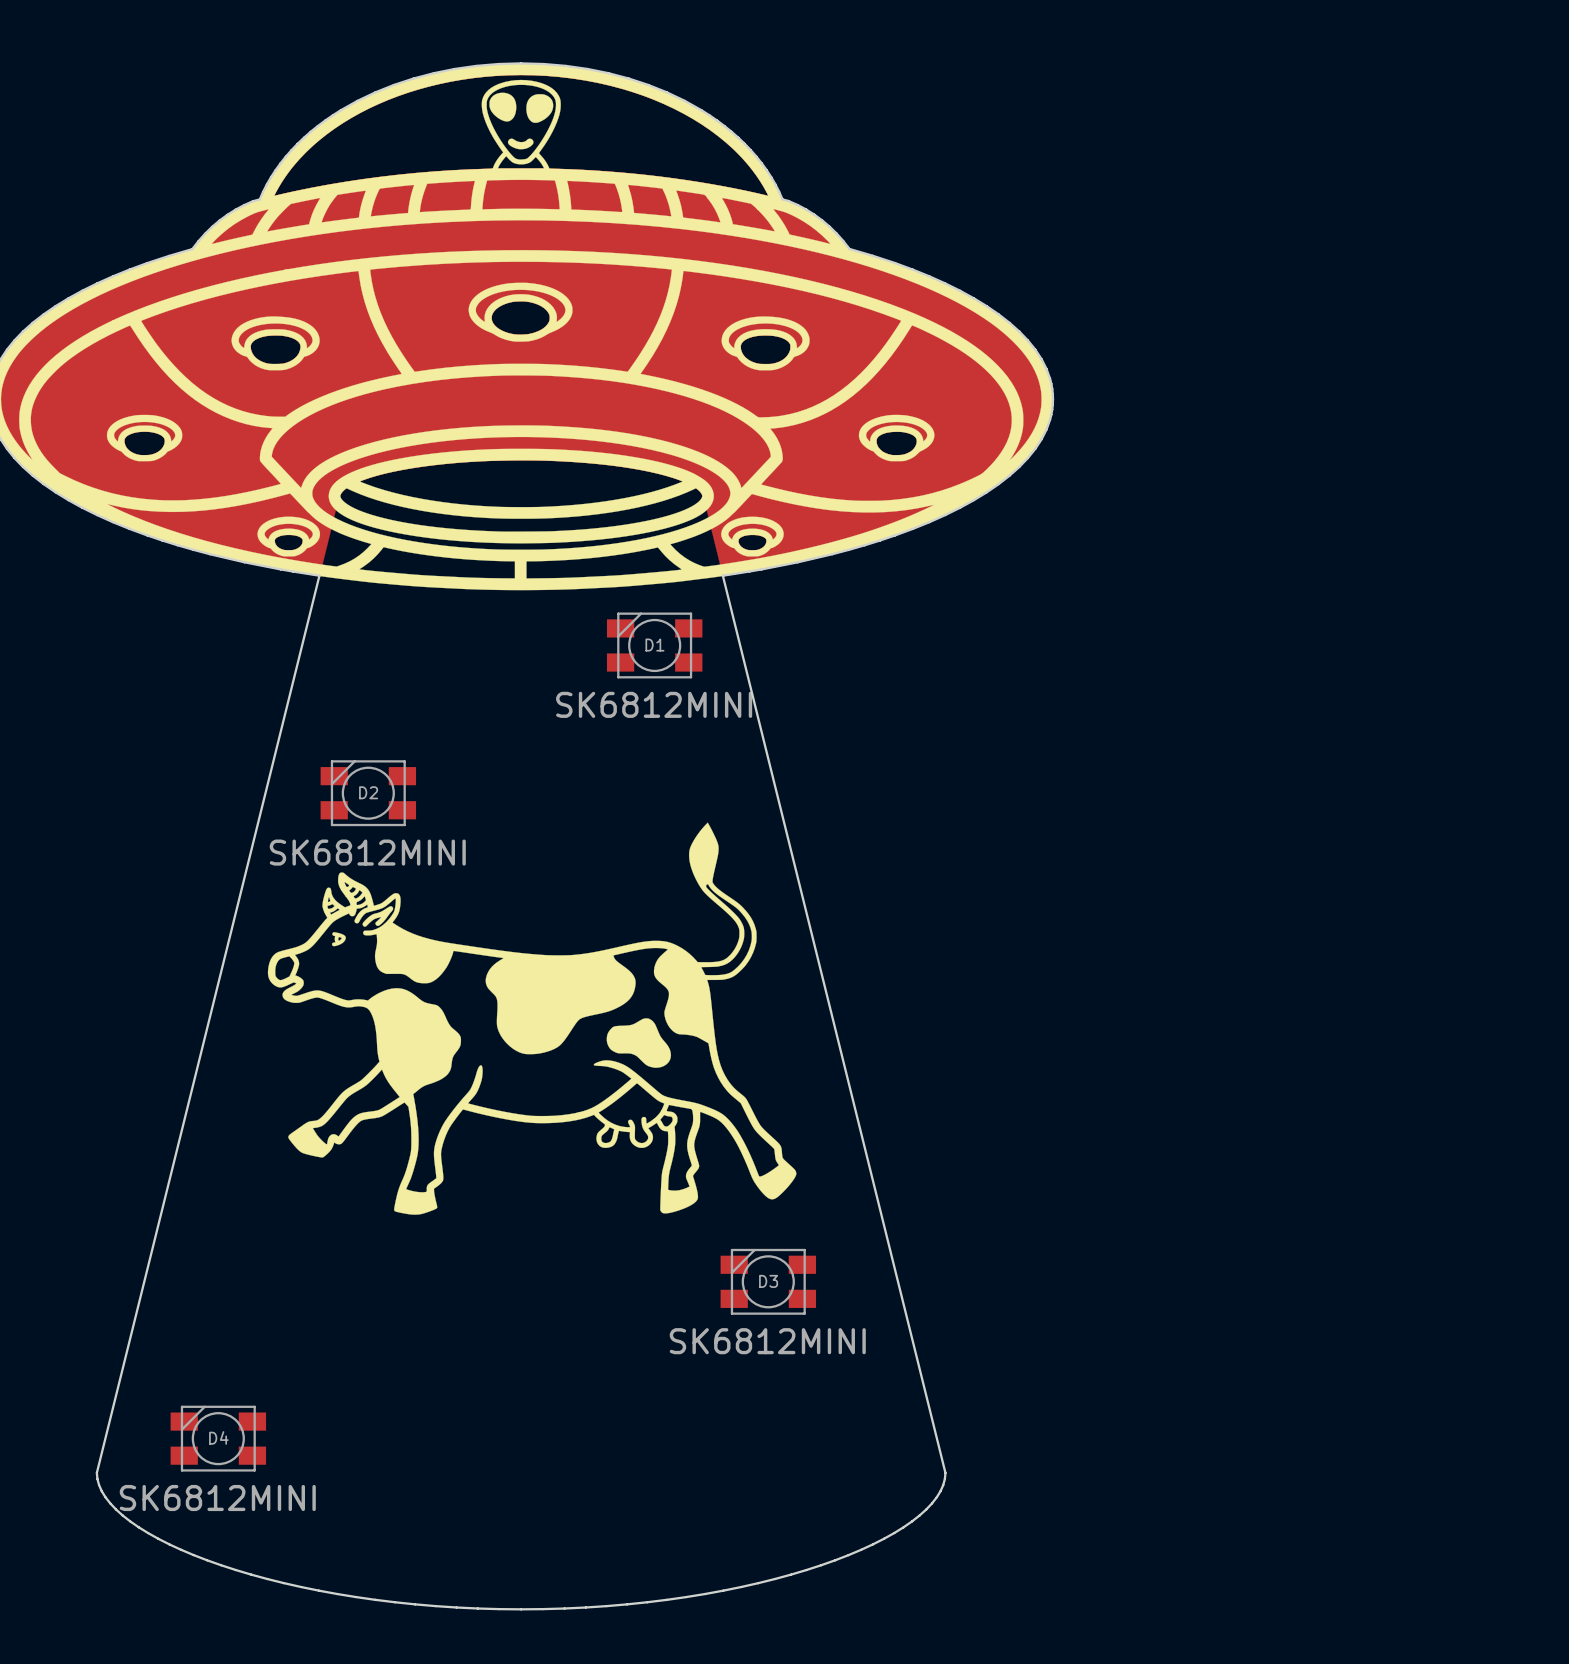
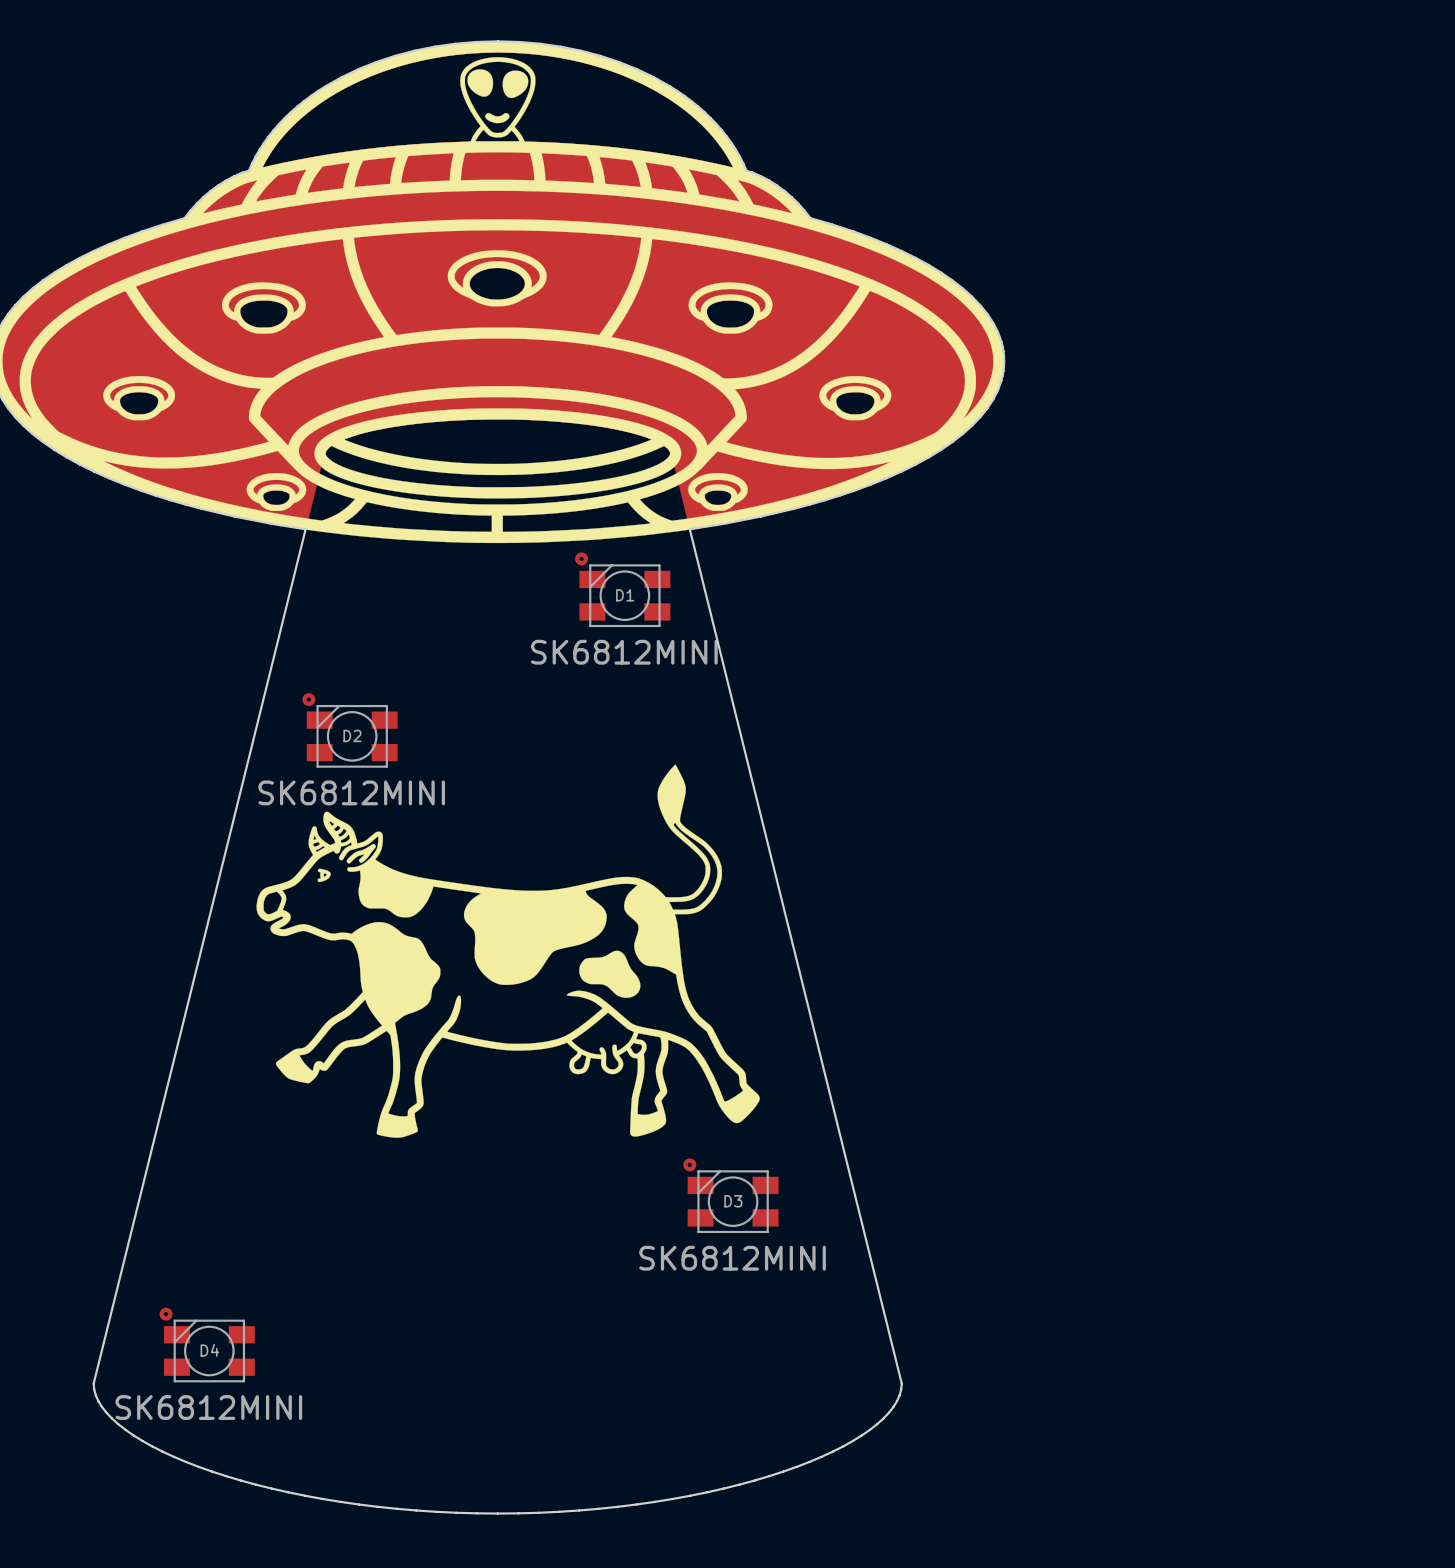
drawing: none -> [575, 552, 589, 566]
drawing: none -> [302, 693, 316, 707]
drawing: none -> [683, 1158, 697, 1172]
drawing: none -> [159, 1307, 173, 1321]

